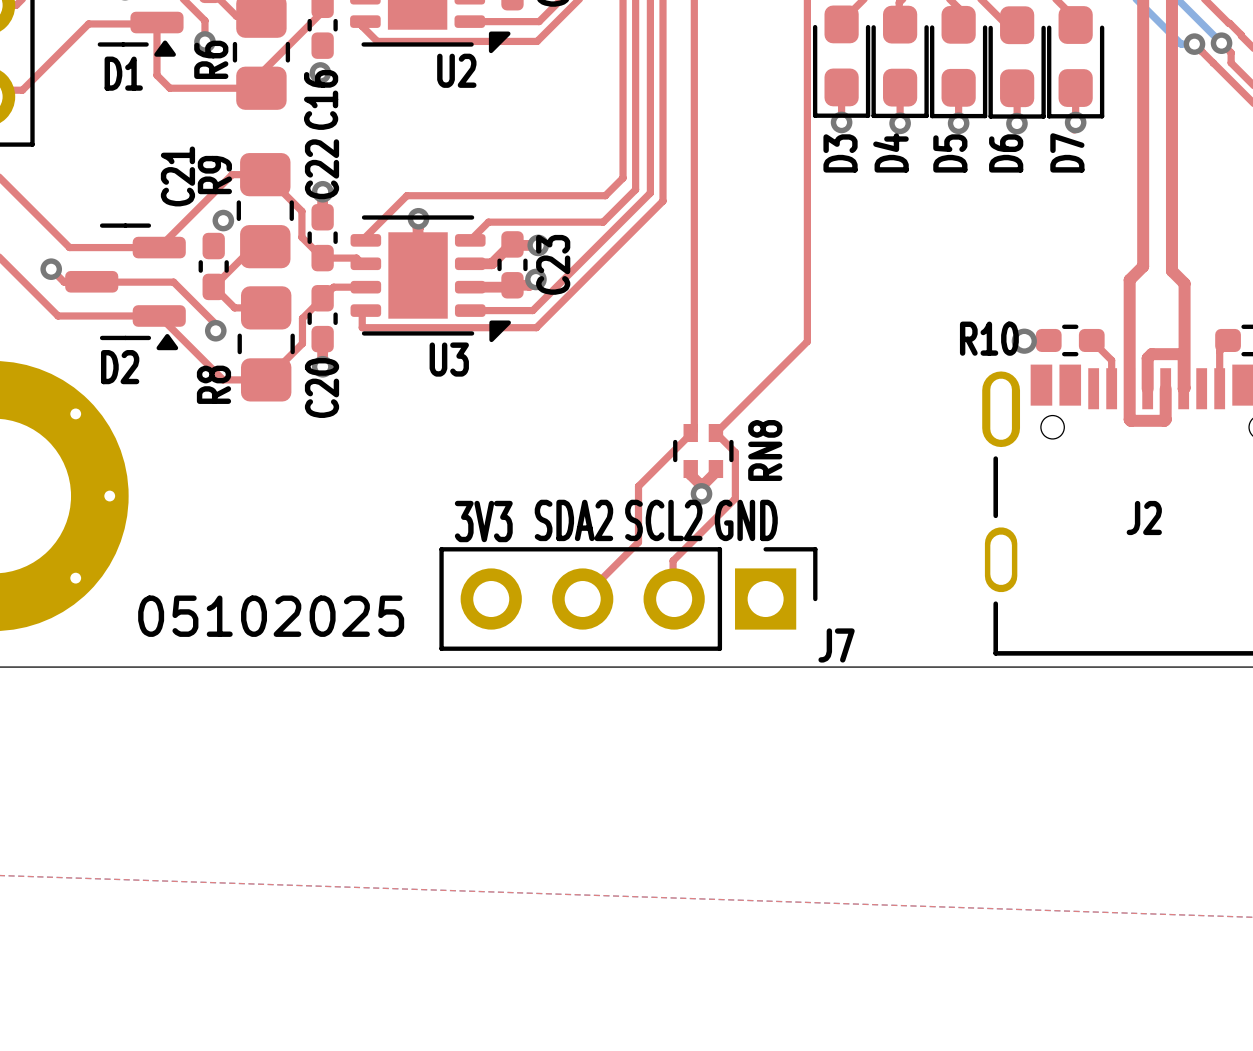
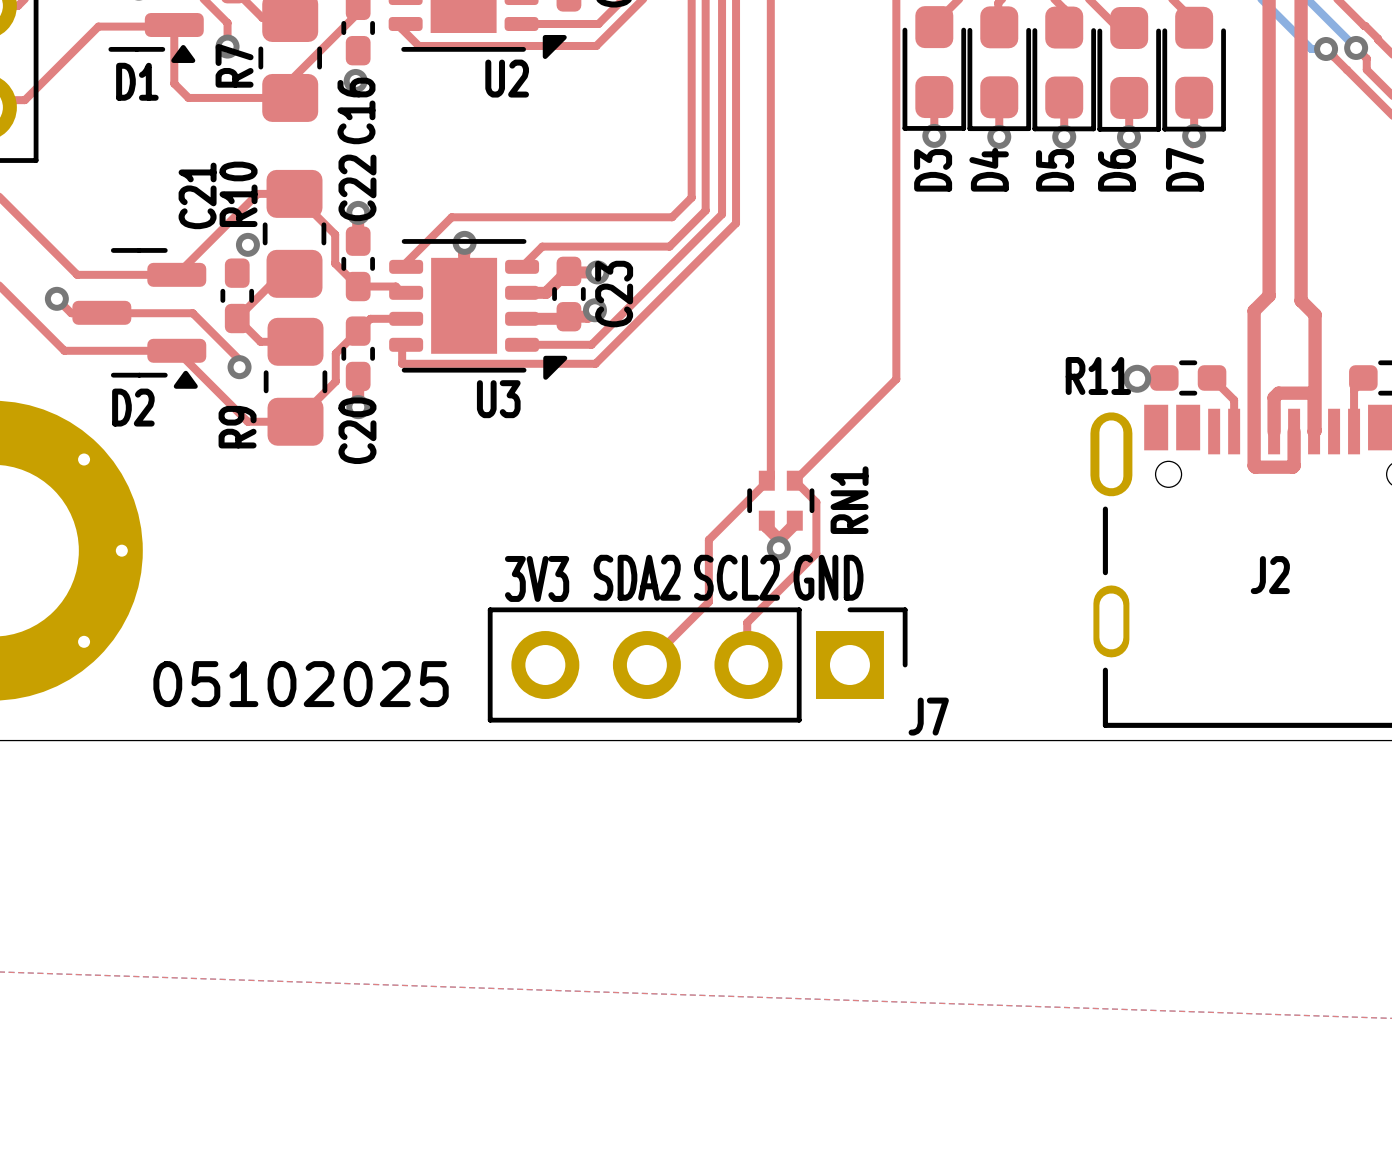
R6 name: R6 (211, 59) -> R7 (234, 65)
R9 name: R9 (214, 175) -> R10 (238, 194)
R10 name: R10 (989, 338) -> R11 (1098, 375)
R8 name: R8 (213, 384) -> R9 (237, 427)
RN8 name: RN8 (765, 450) -> RN1 (849, 500)

